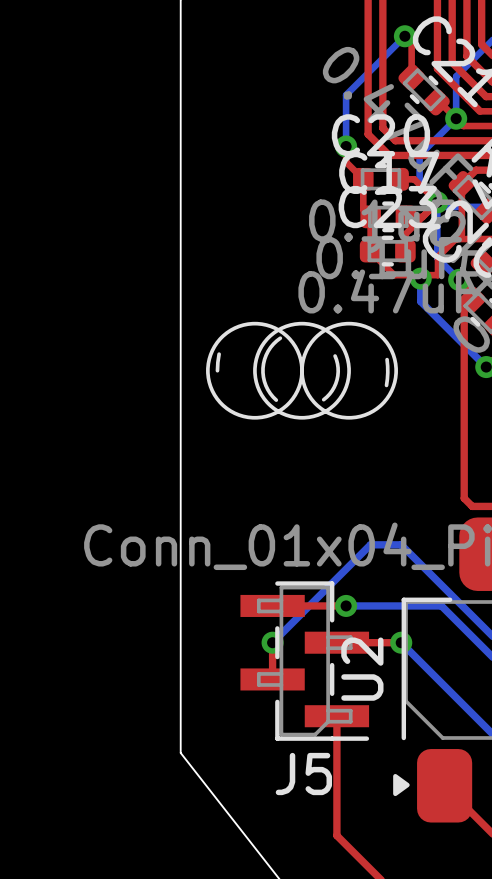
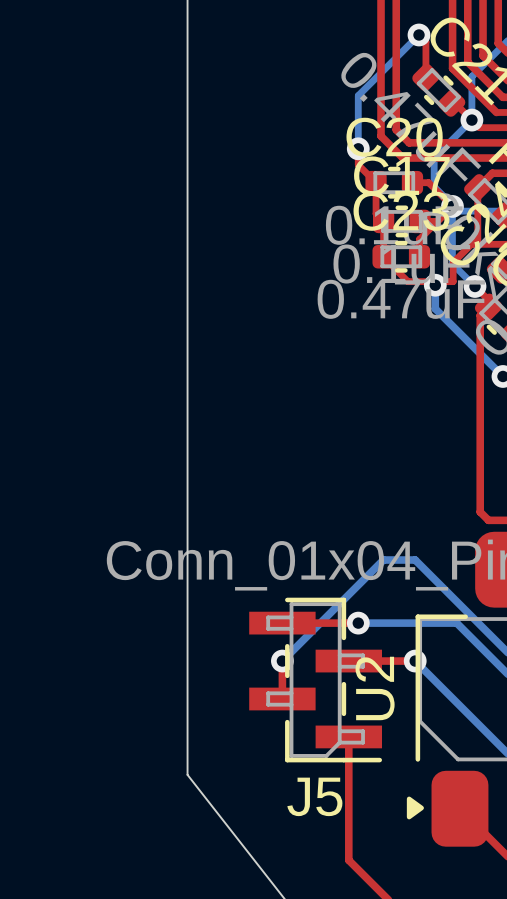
drawing: [206, 321, 398, 420] -> none
line: (280, 338) (268, 351) (263, 368) (265, 385) (276, 400) -> none
line: (219, 354) (217, 370) -> none
line: (335, 356) (338, 367) (337, 379) (332, 390) (323, 399) -> none
line: (387, 359) (386, 385) -> none

